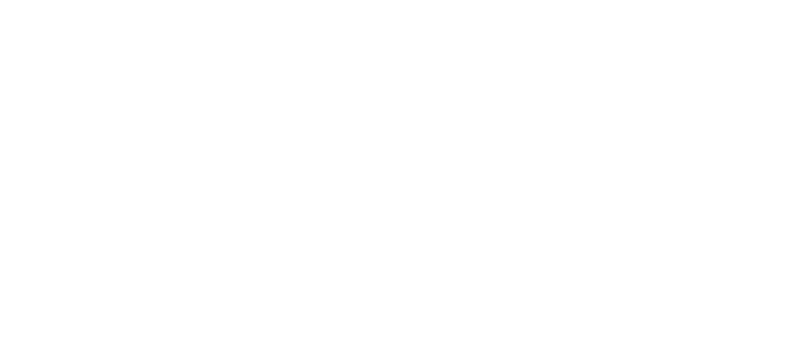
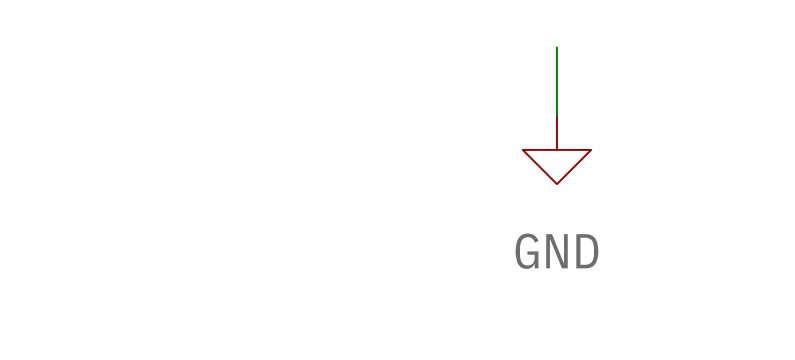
wire: none -> (556, 47) (556, 115)
power symbol: none -> GND (556, 149)

